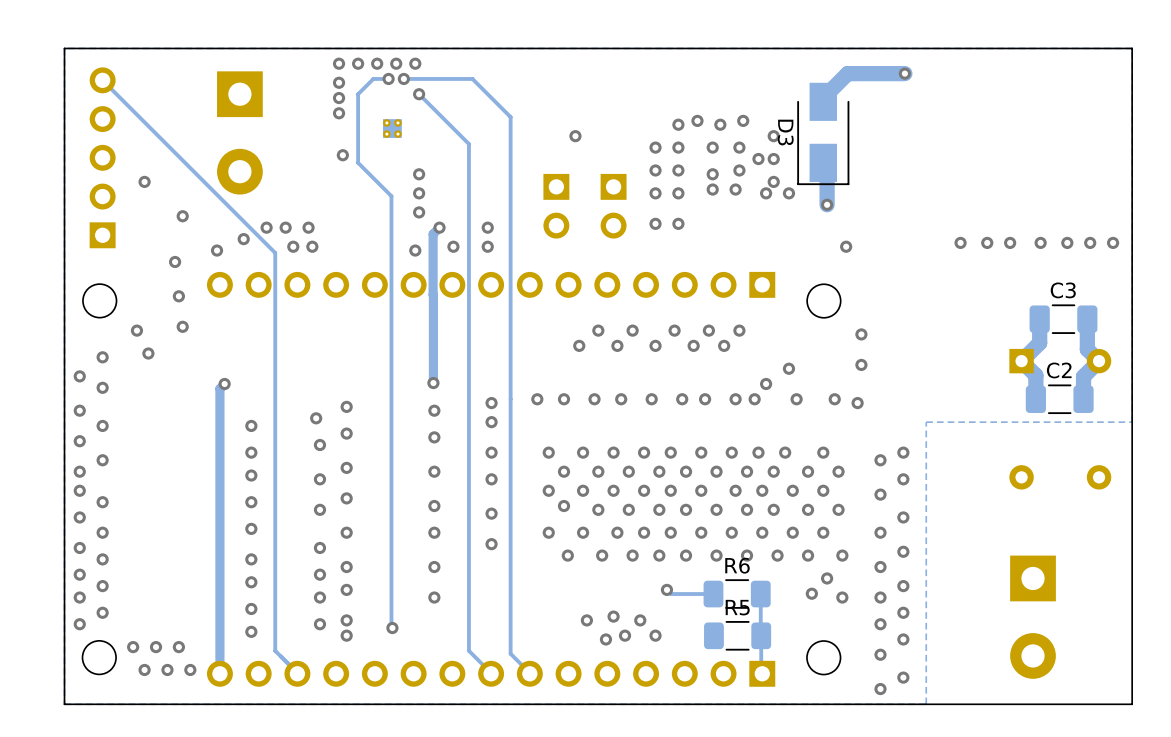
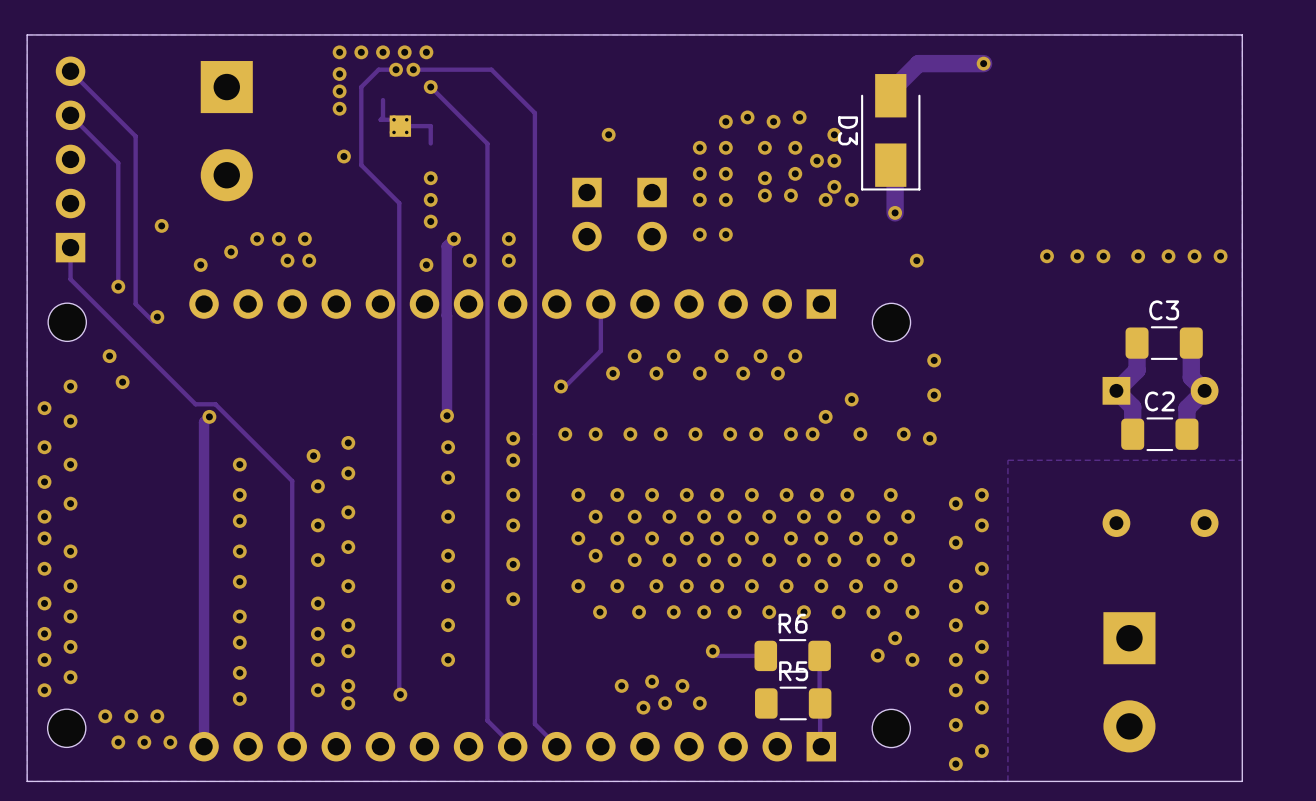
track: none -> (383, 100) (383, 117) (380, 119) (394, 119)
track: none -> (70, 115) (118, 163) (118, 286)
track: none -> (400, 126) (430, 126) (430, 143)
track: (159, 137) (275, 252) (275, 650) (297, 673) -> (135, 136) (135, 304) (153, 321)
via: (144, 181) -> none
track: none -> (70, 247) (70, 279) (195, 404) (215, 404) (292, 481) (292, 746)
via position: (175, 261) -> (118, 286)
track: none -> (600, 304) (600, 350) (565, 386) (560, 386)
via: (182, 326) -> none
via: none -> (560, 386)

